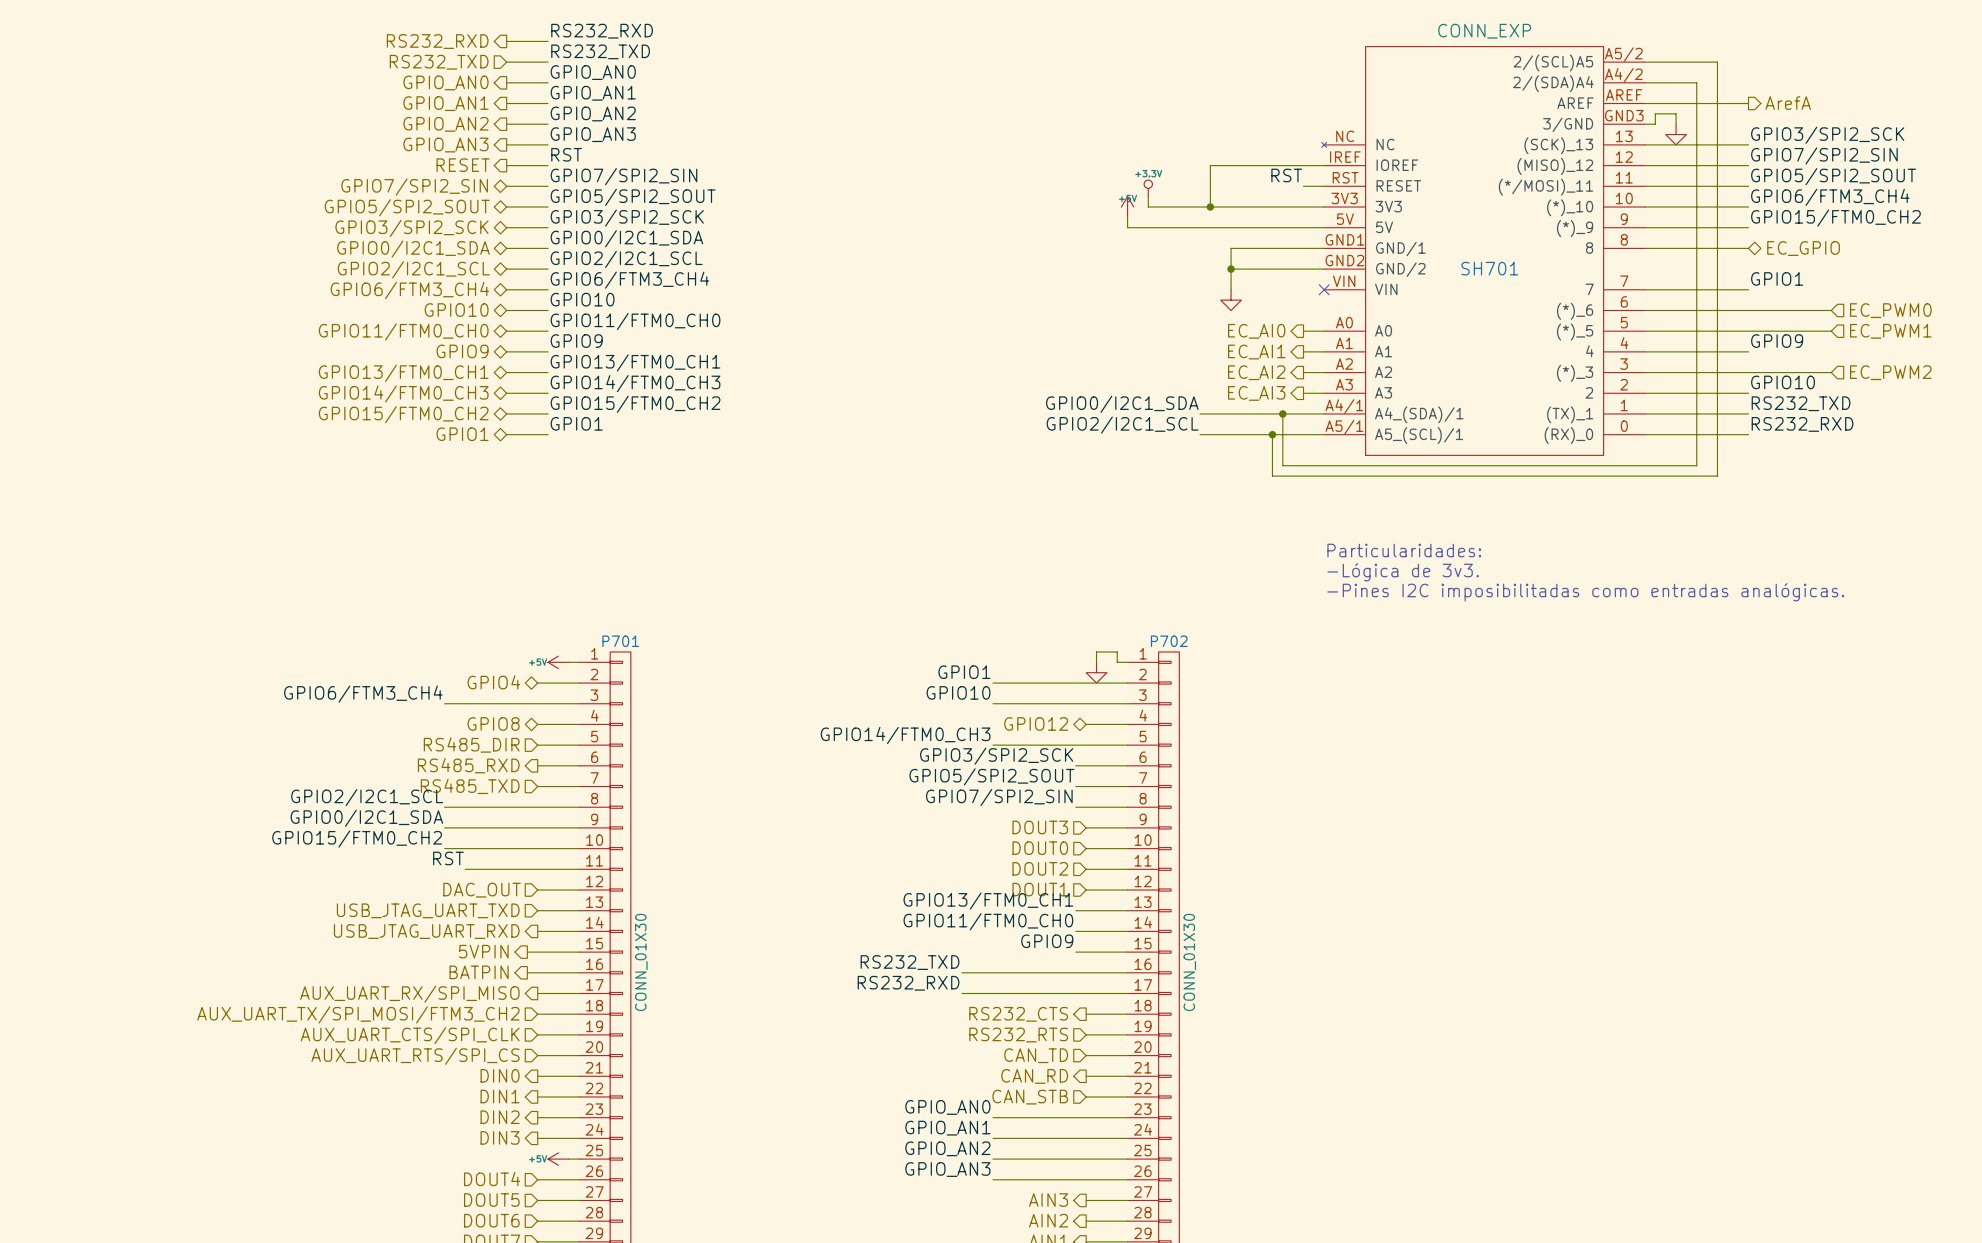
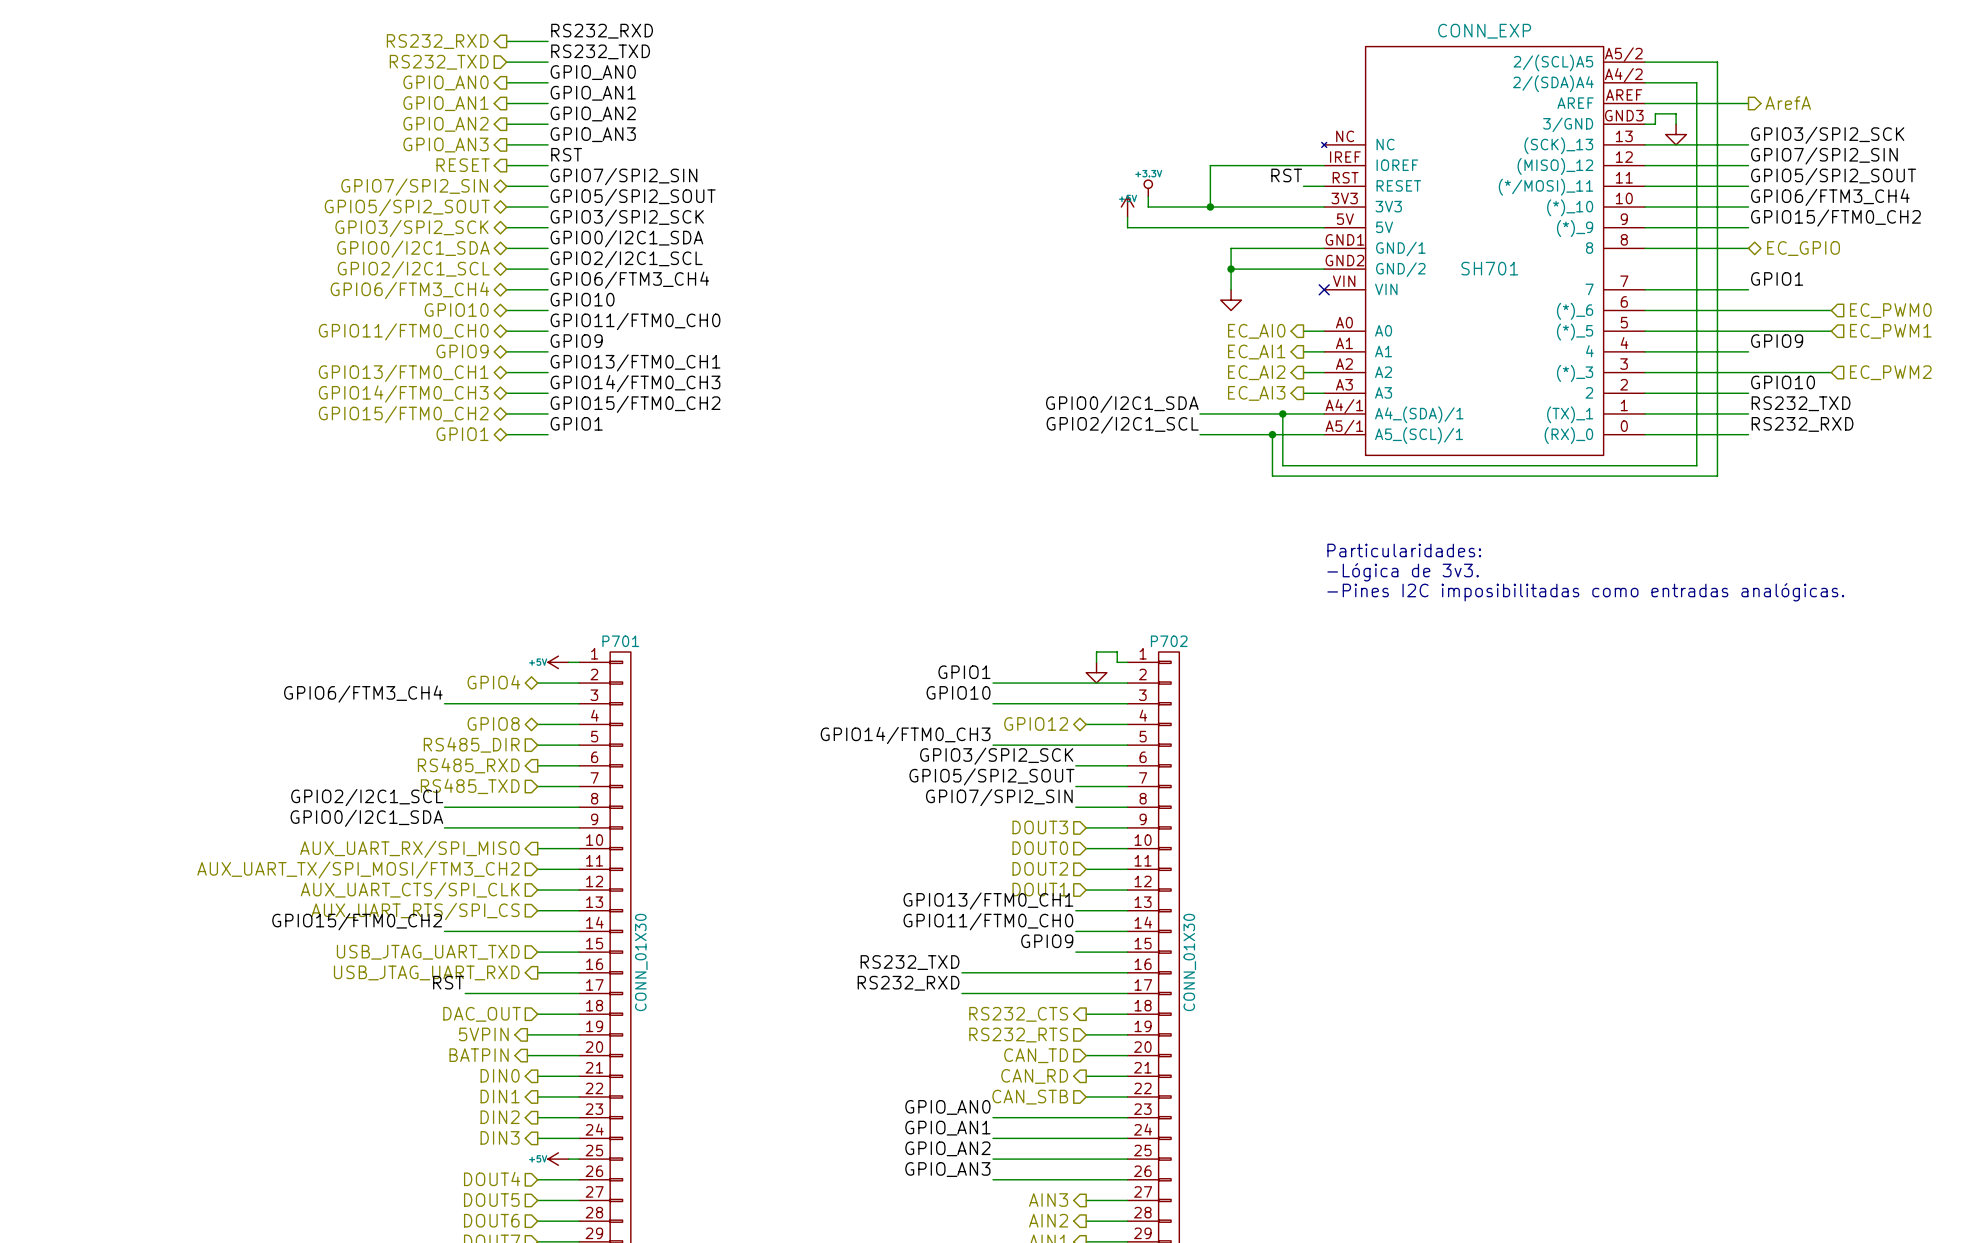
label position: GPIO15/FTM0_CH2 (357, 838) -> GPIO15/FTM0_CH2 (357, 921)
wire: (444, 848) (537, 848) -> (444, 931) (537, 931)
label position: RST (448, 858) -> RST (448, 982)
wire: (465, 869) (537, 869) -> (465, 993) (537, 993)
hierarchical label: none -> AUX_UART_TX/SPI_MOSI/FTM3_CH2 (358, 870)
hierarchical label: DAC_OUT (482, 890) -> AUX_UART_CTS/SPI_CLK (410, 890)
hierarchical label: USB_JTAG_UART_TXD (428, 910) -> AUX_UART_RTS/SPI_CS (415, 911)
hierarchical label position: USB_JTAG_UART_RXD (426, 931) -> USB_JTAG_UART_RXD (426, 972)
hierarchical label position: 5VPIN (483, 951) -> 5VPIN (483, 1034)
hierarchical label: none -> USB_JTAG_UART_TXD (428, 952)
wire: (527, 952) (537, 952) -> (527, 1034) (537, 1034)
hierarchical label position: BATPIN (479, 972) -> BATPIN (479, 1055)
wire: (527, 972) (537, 972) -> (527, 1055) (537, 1055)
hierarchical label position: AUX_UART_RX/SPI_MISO (409, 994) -> AUX_UART_RX/SPI_MISO (409, 849)
hierarchical label: AUX_UART_TX/SPI_MOSI/FTM3_CH2 (358, 1014) -> DAC_OUT (482, 1014)
hierarchical label: AUX_UART_CTS/SPI_CLK (410, 1035) -> none
hierarchical label: AUX_UART_RTS/SPI_CS (415, 1056) -> none

